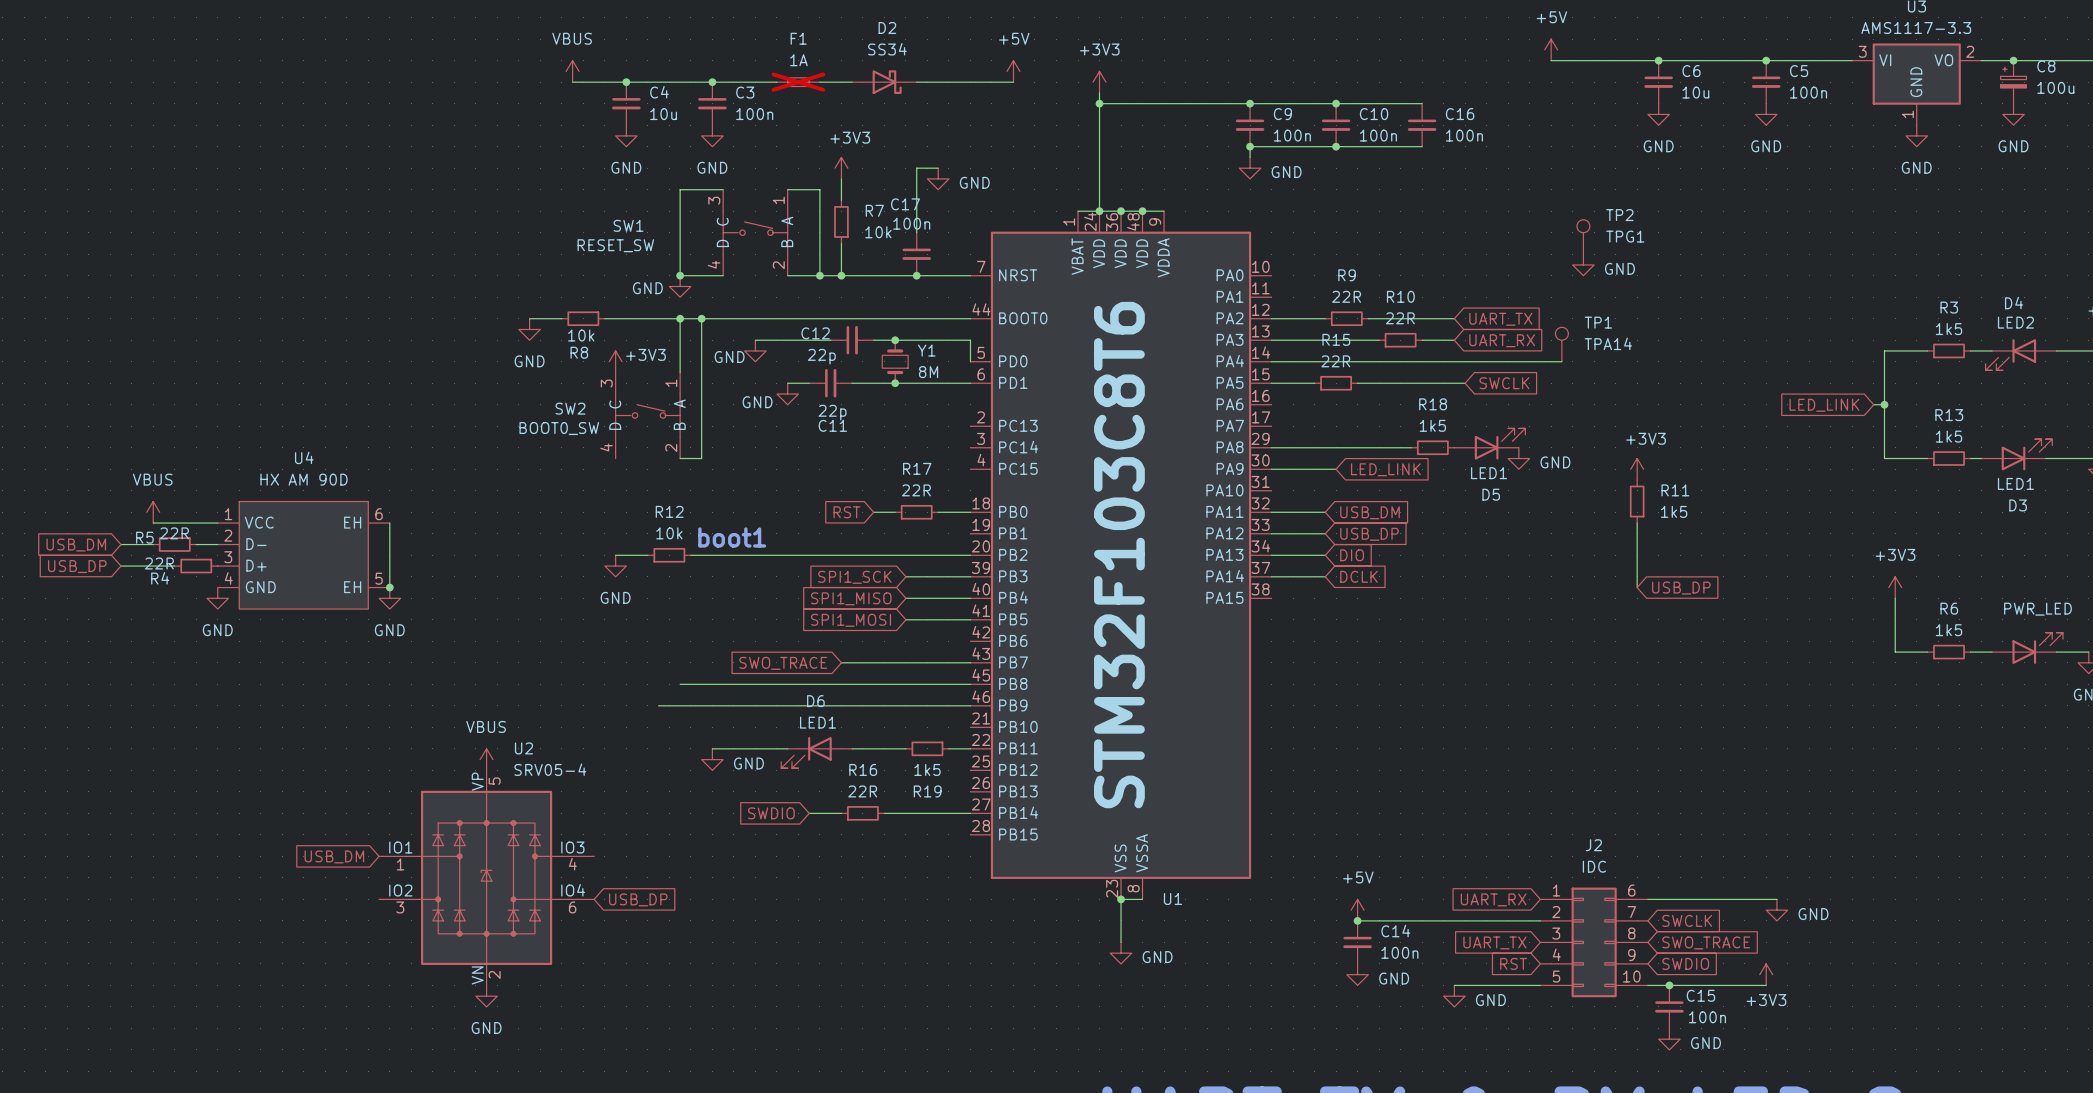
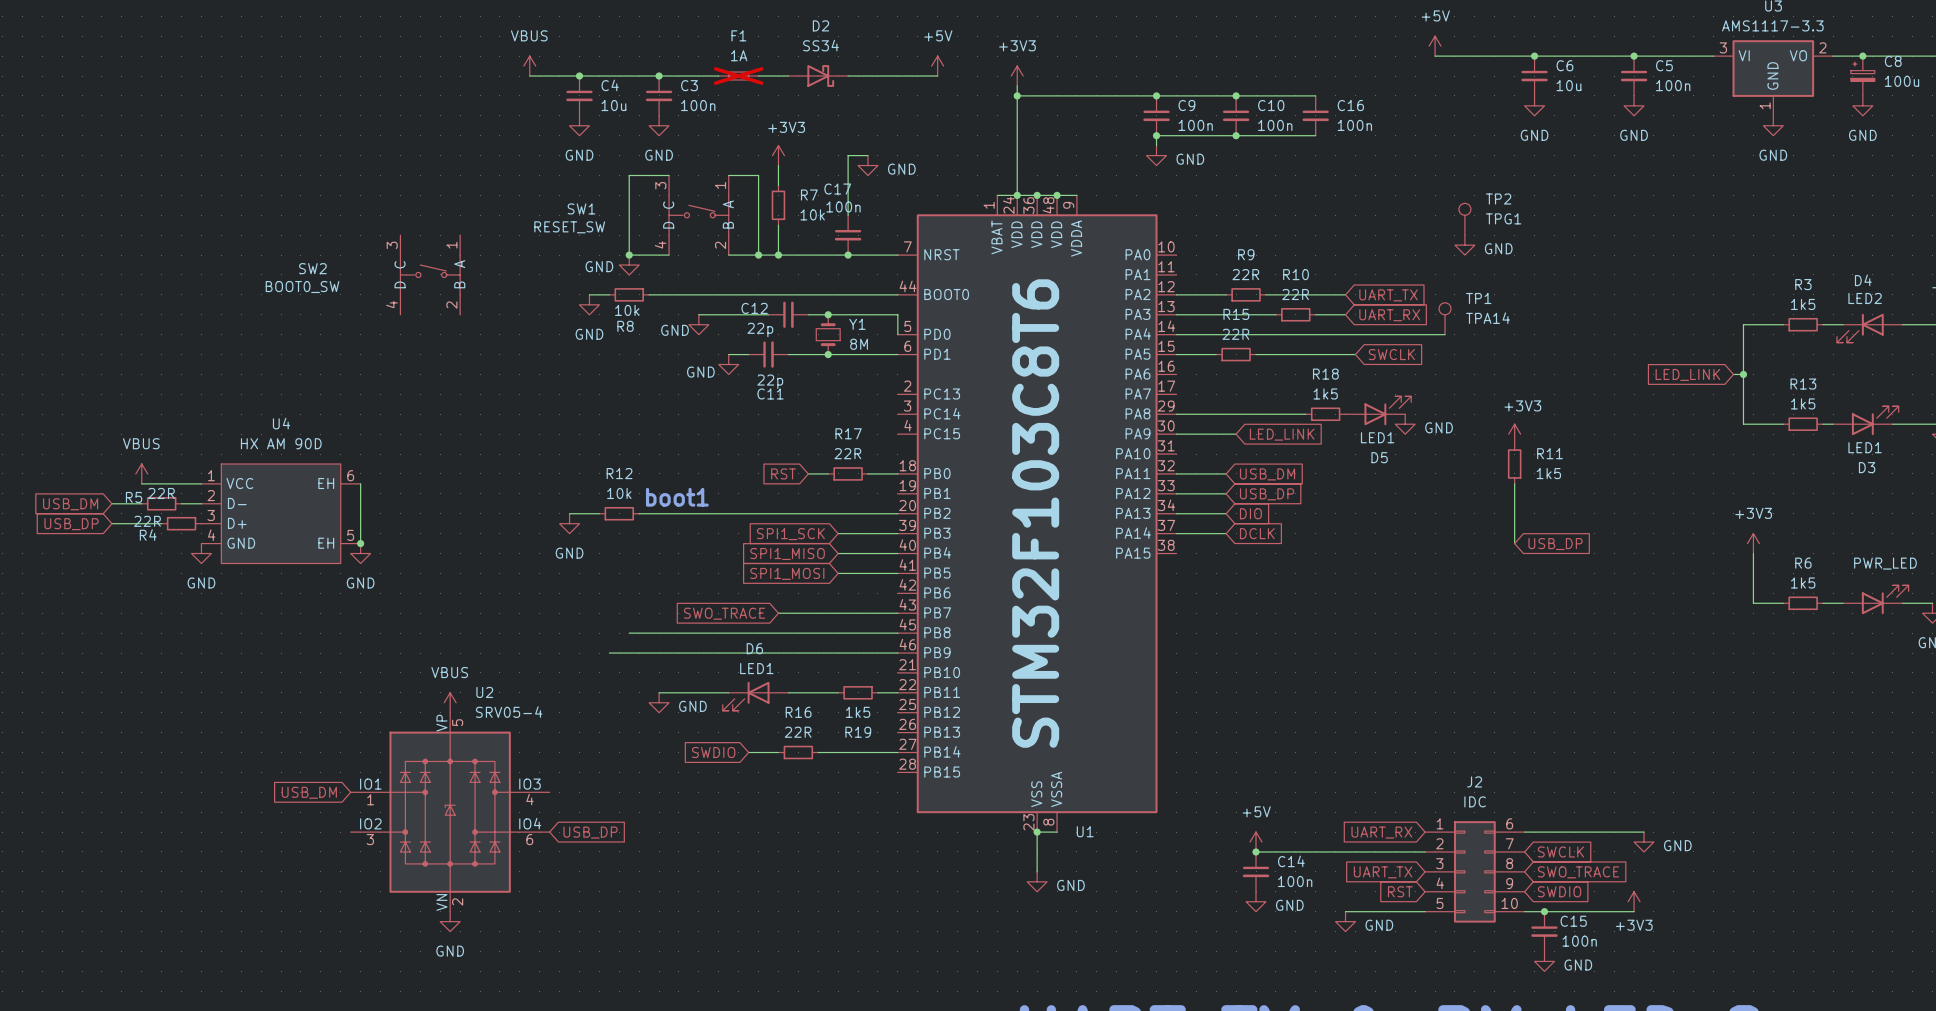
wire: (529, 318) (561, 318) -> none
R8 position: (583, 318) -> (629, 294)
wire: (604, 318) (637, 318) -> none
wire: (658, 318) (701, 318) (701, 458) (680, 458) -> none
wire: (680, 318) (680, 372) -> none
junction: (680, 318) -> none
junction: (701, 318) -> none
power symbol position: GND (529, 329) -> GND (589, 304)
power symbol: +3V3 (615, 361) -> none
SW2 name position: SW2 (570, 408) -> SW2 (312, 268)
SW2 position: (647, 415) -> (430, 274)
SW2 value position: BOOT0_SW (559, 428) -> BOOT0_SW (302, 287)

